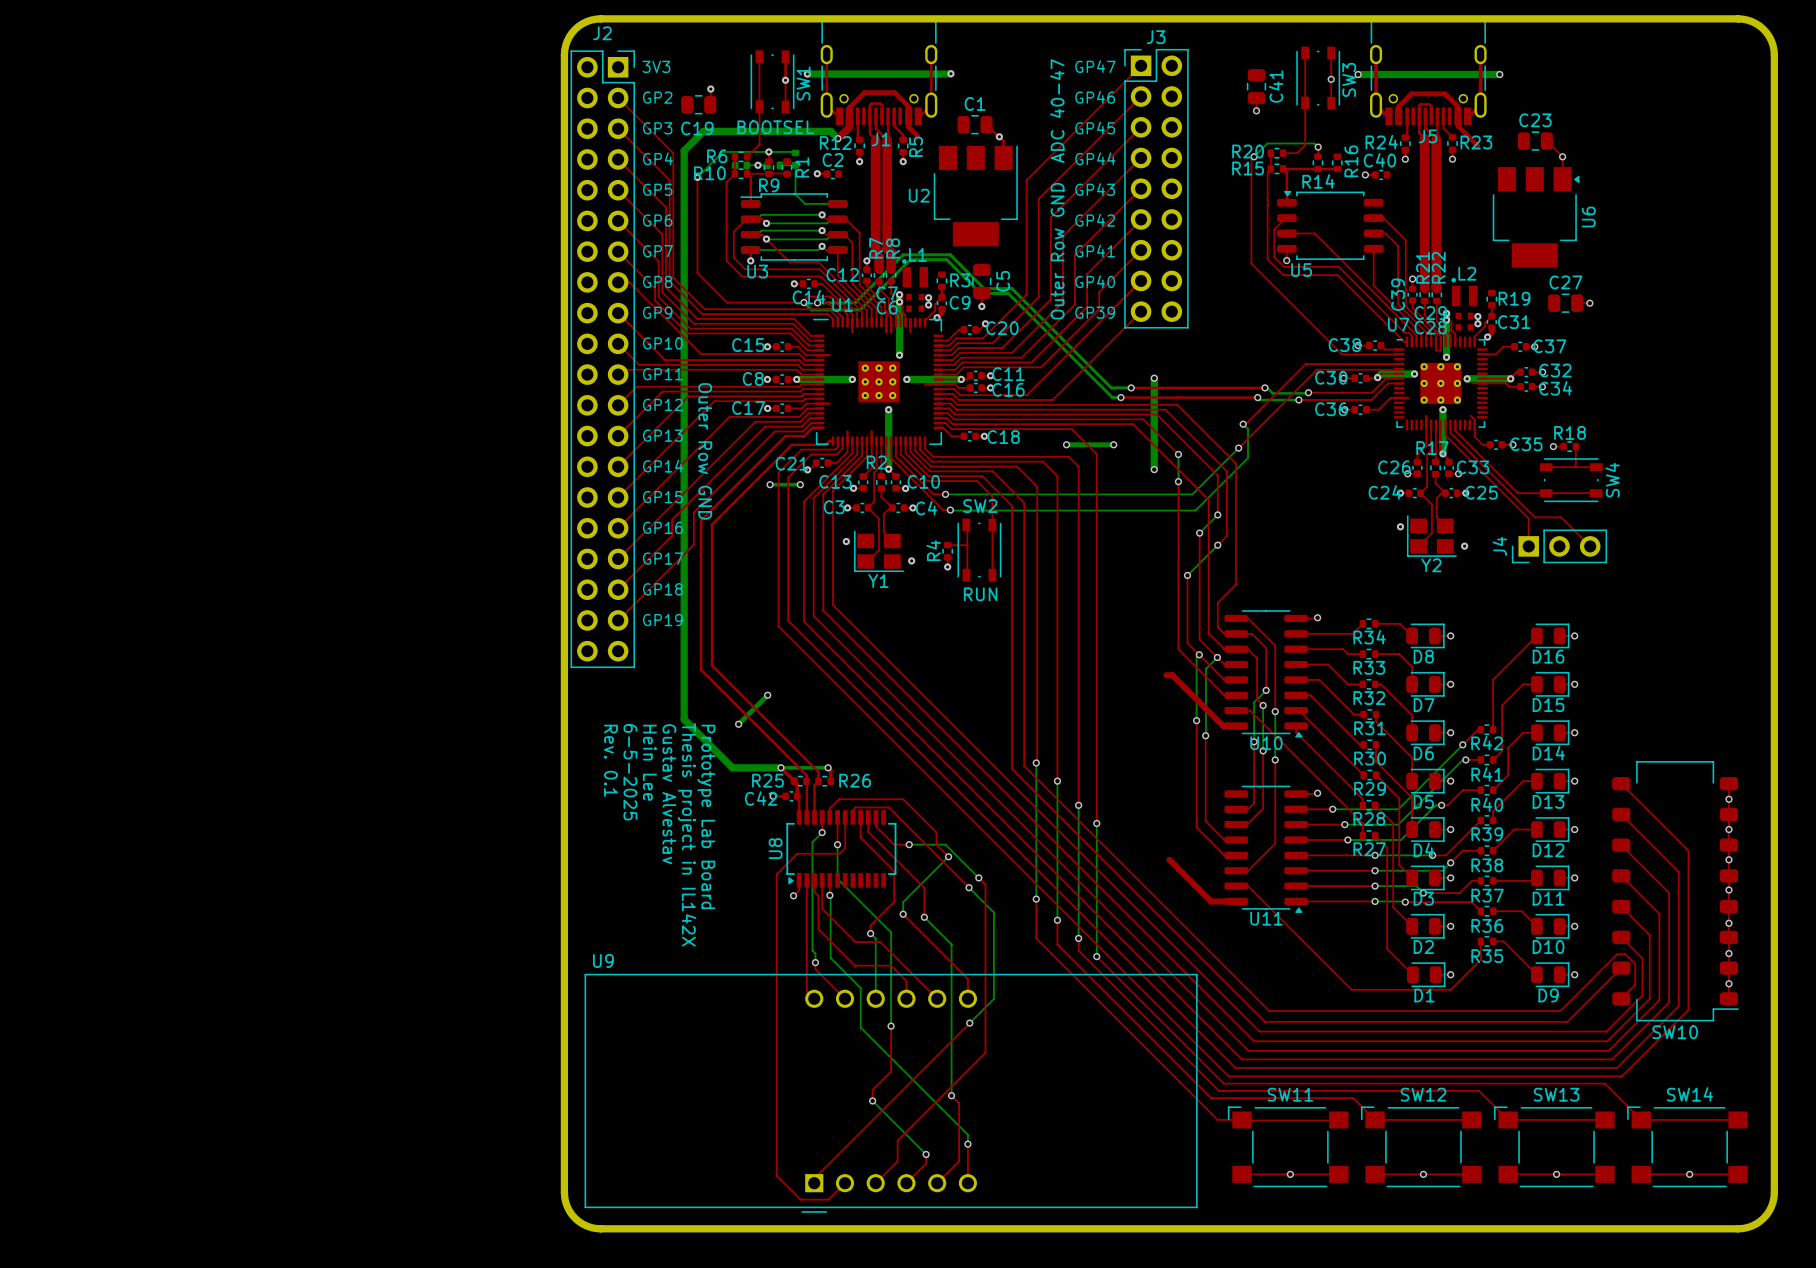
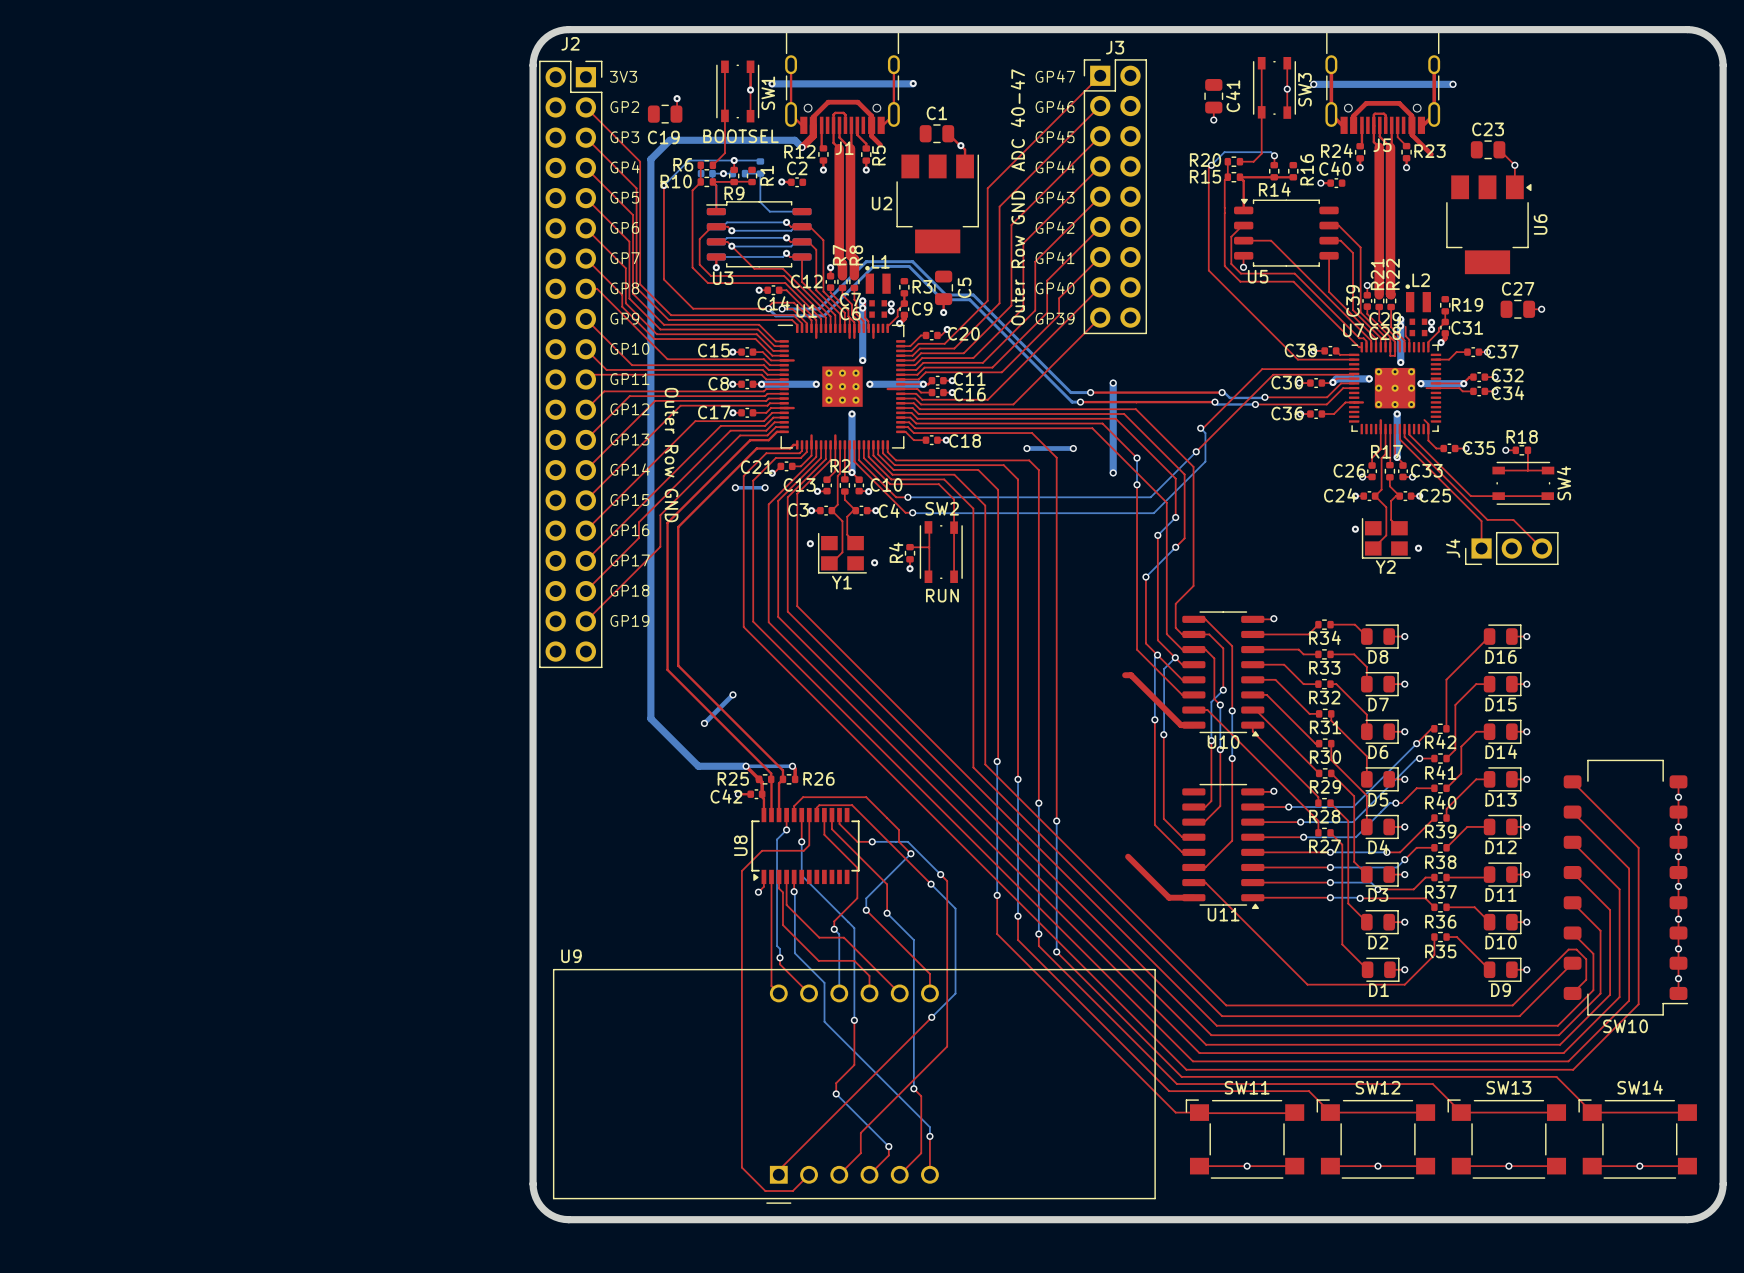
text: Rev. 0.1 (610, 760) -> none
text: Hein Lee (649, 762) -> none
text: 6-5-2025 (630, 772) -> none
text: Gustav Alvestav (669, 794) -> none
text: Prototype Lab Board (706, 816) -> none
text: Thesis project in IL142X (687, 834) -> none

